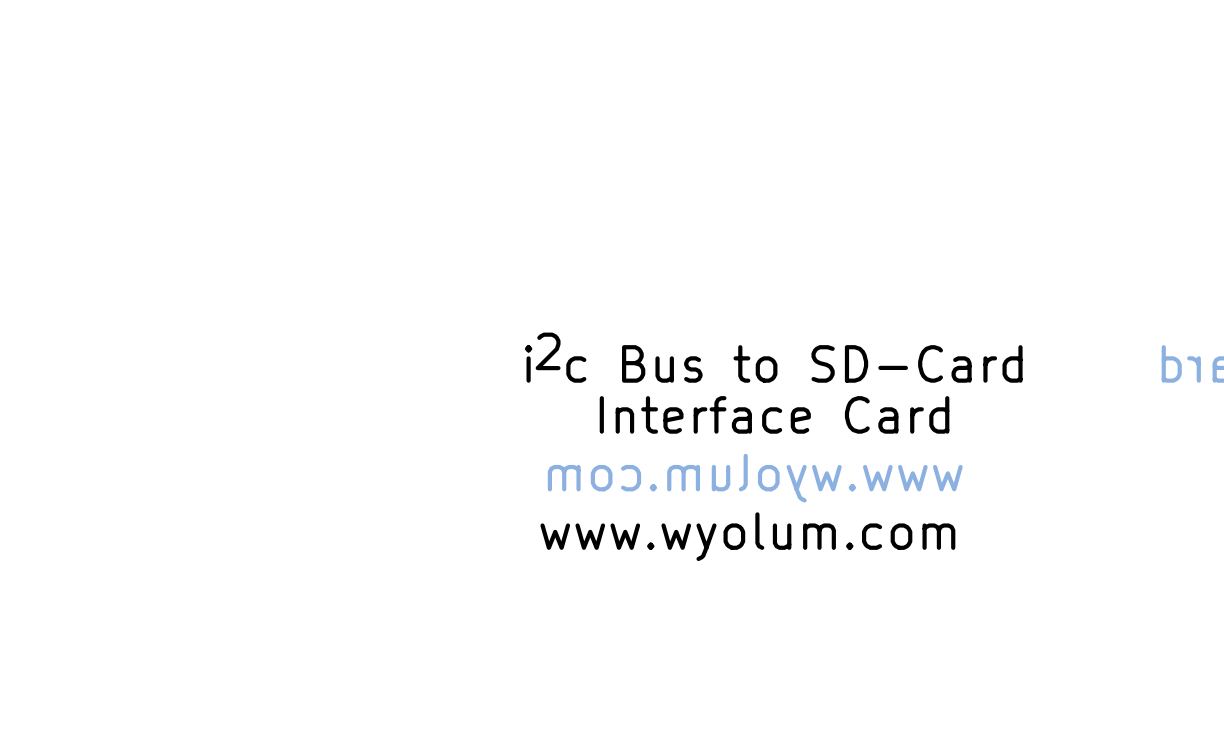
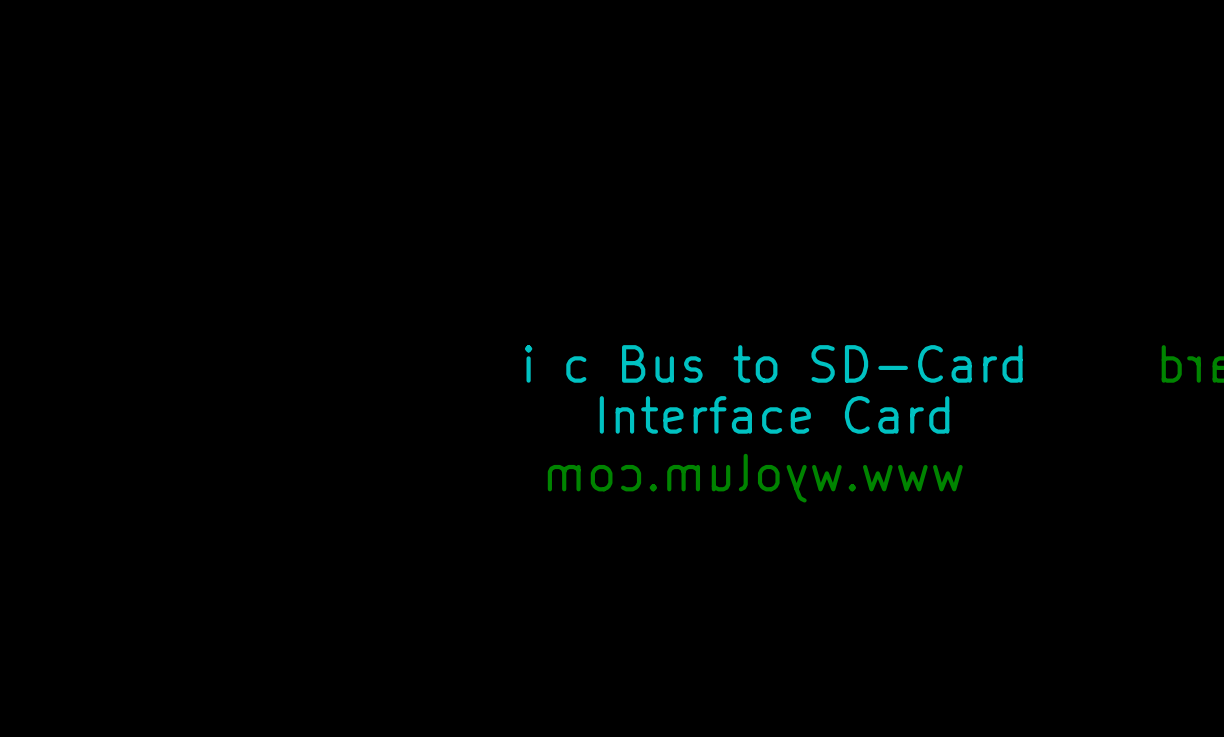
text: 2 (548, 351) -> none
text: www.wyolum.com (747, 536) -> none

